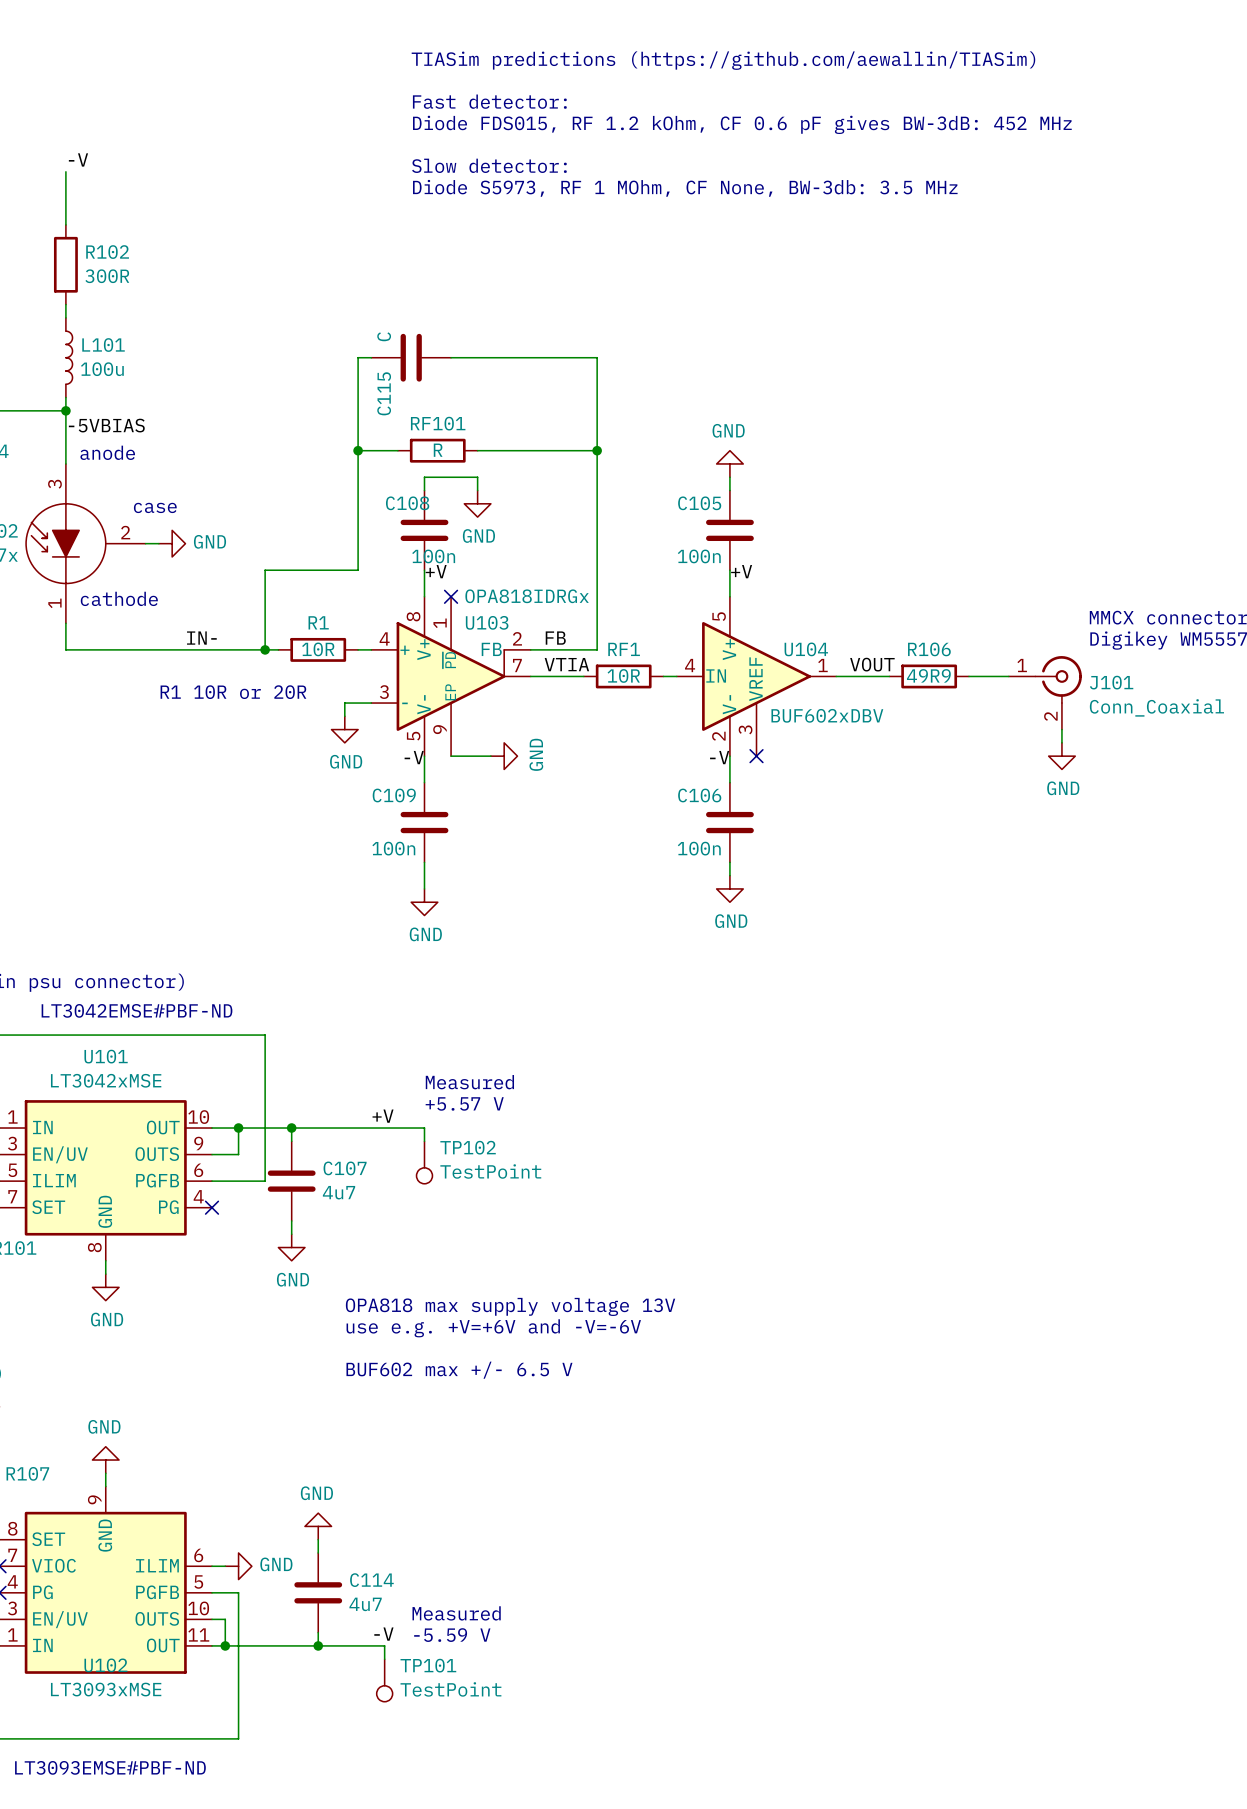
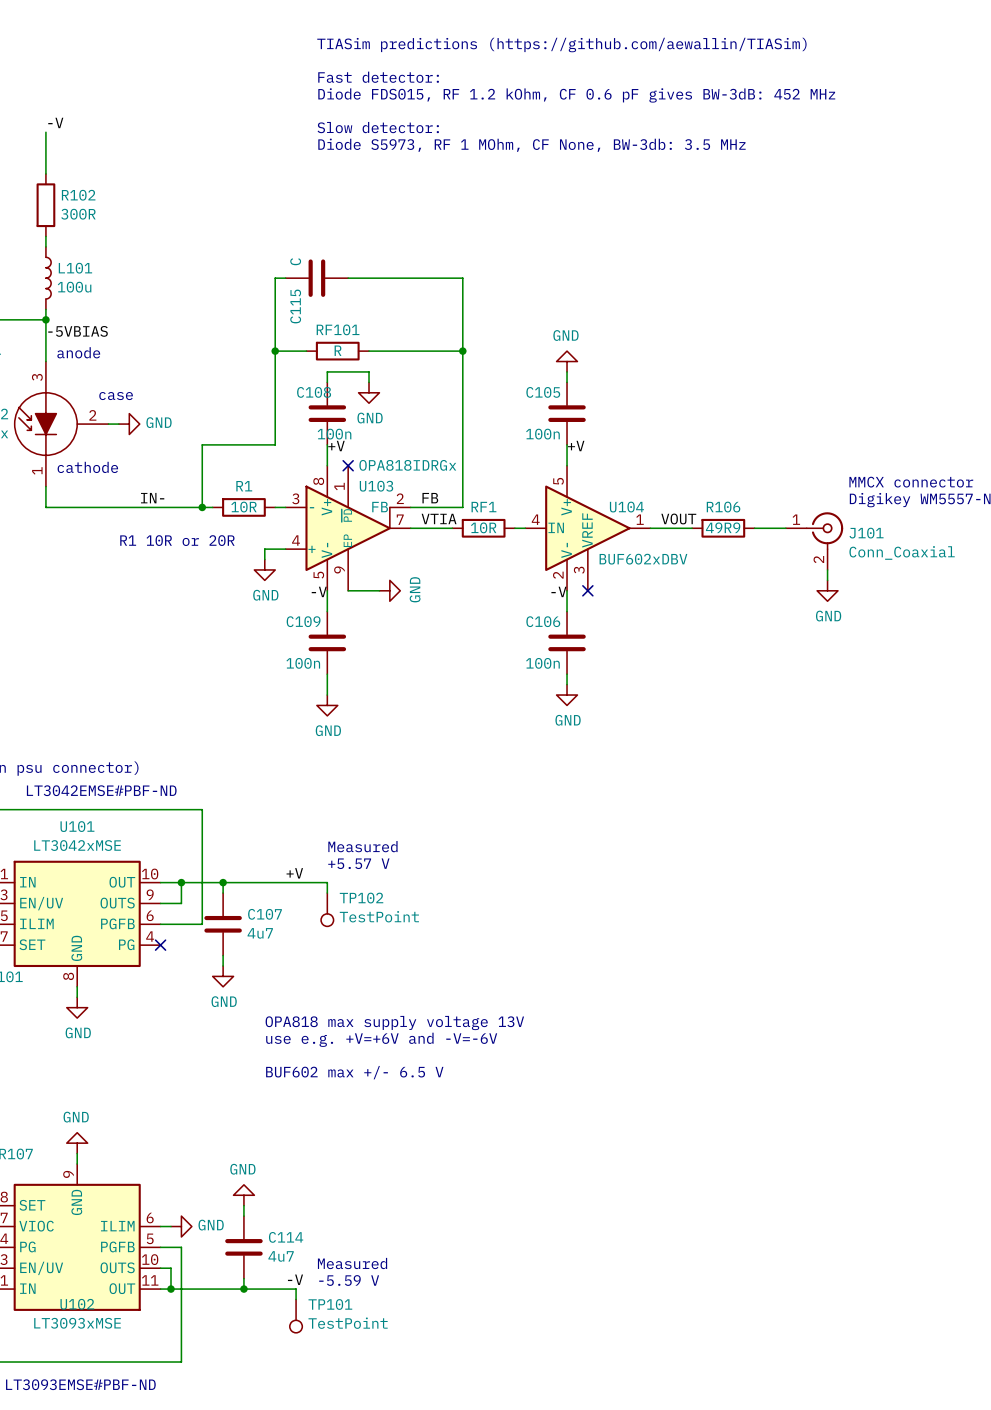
U103 pin number: 4 (384, 638) -> 3 (295, 498)
U103 pin name: + (404, 650) -> - (312, 507)
U103 pin number: 3 (384, 692) -> 4 (296, 540)
U103 pin name: - (404, 703) -> + (312, 549)

